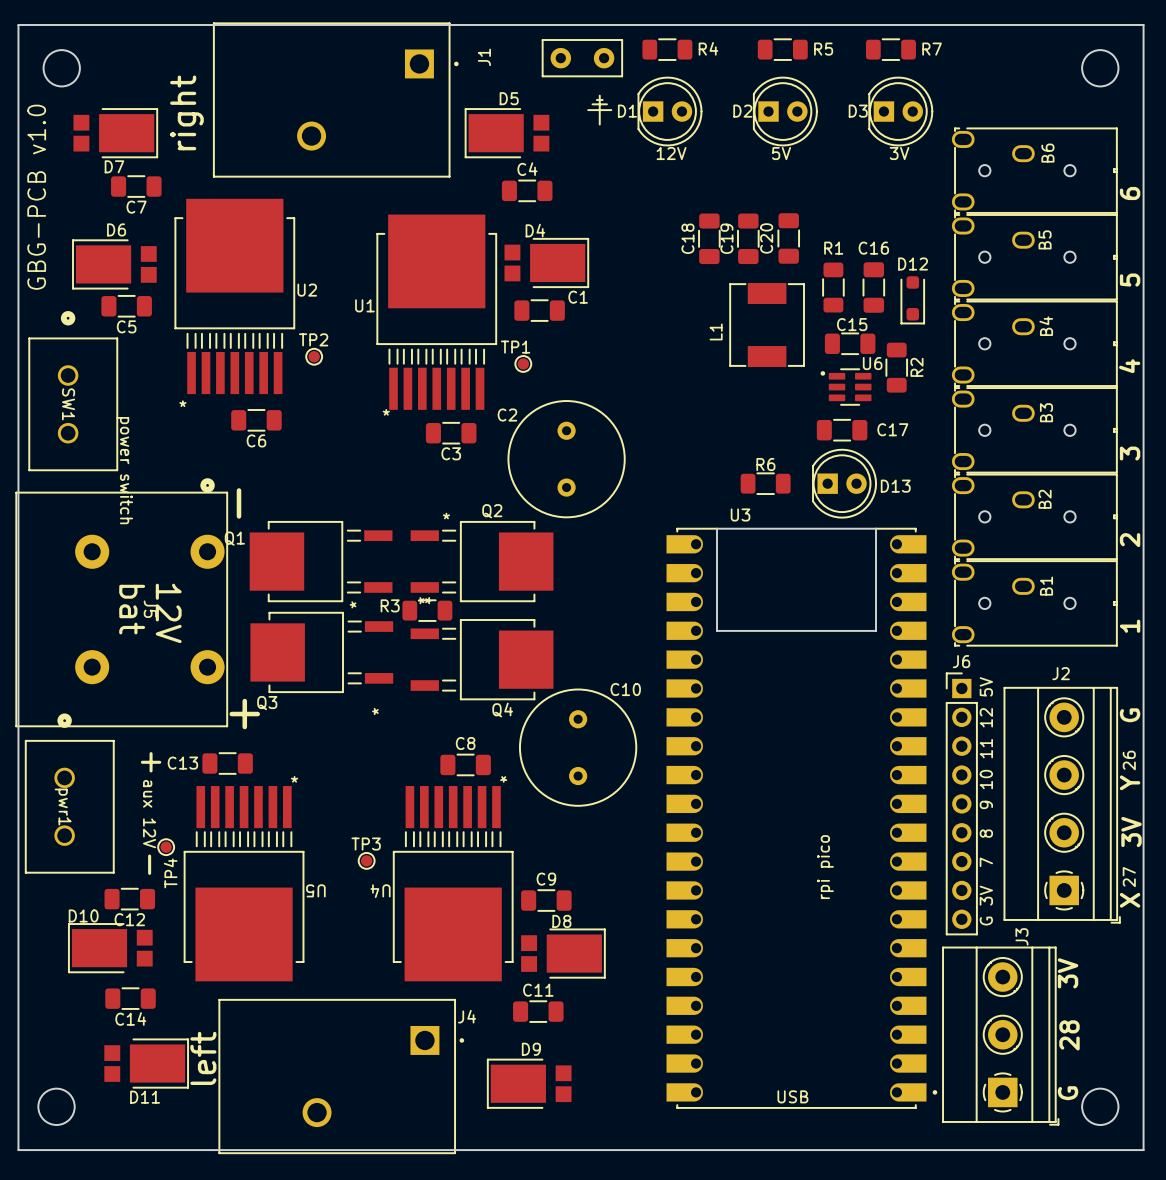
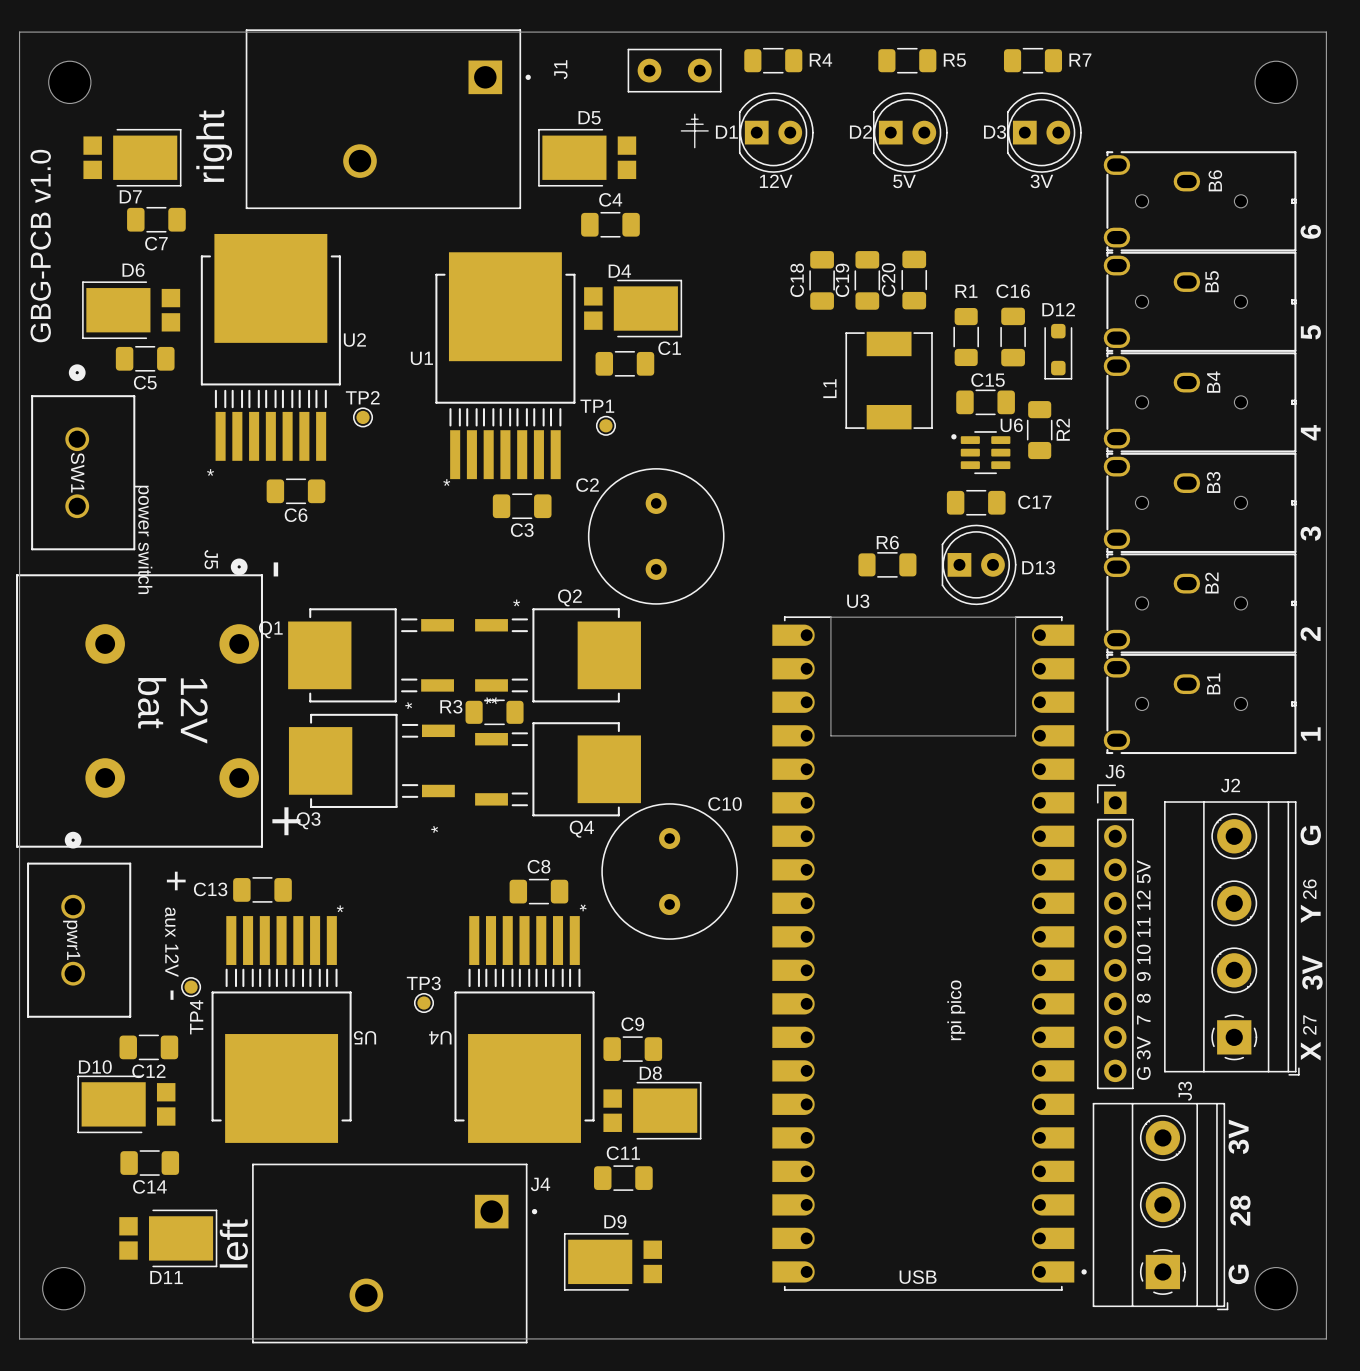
J5 name position: J5 (150, 609) -> J5 (211, 559)

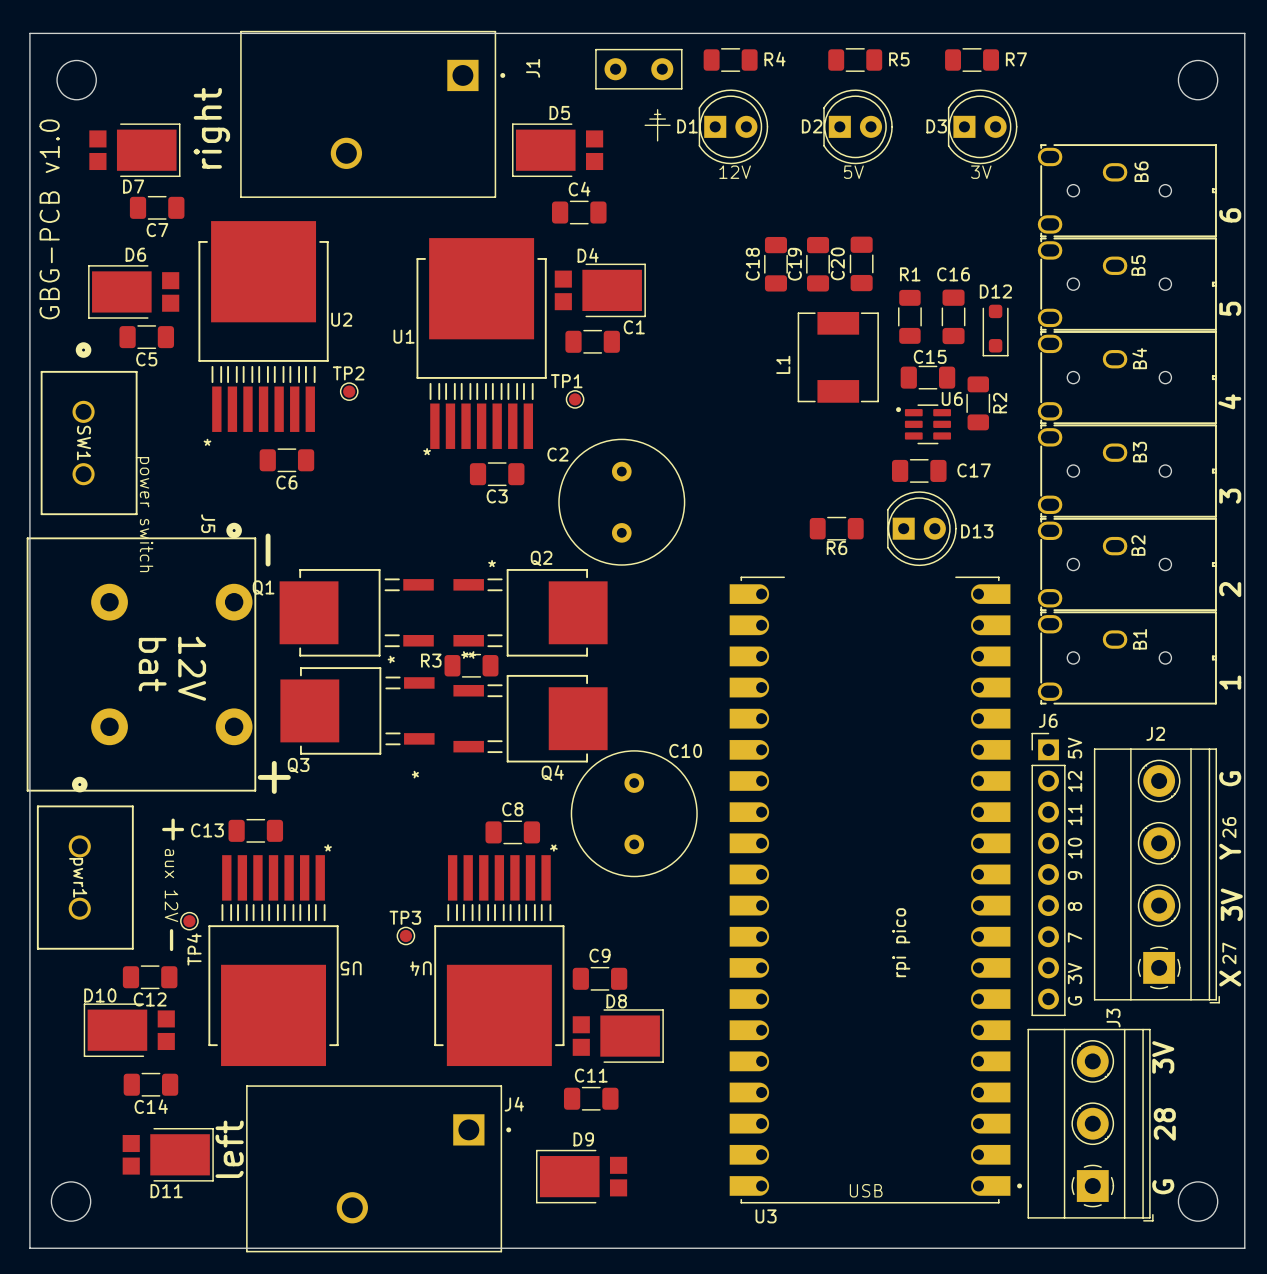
R6 name position: R6 (887, 542) -> R6 (837, 548)
U3 name position: U3 (858, 601) -> U3 (766, 1216)
U3 footprint: [772, 616, 1087, 1291] -> [729, 576, 1023, 1204]

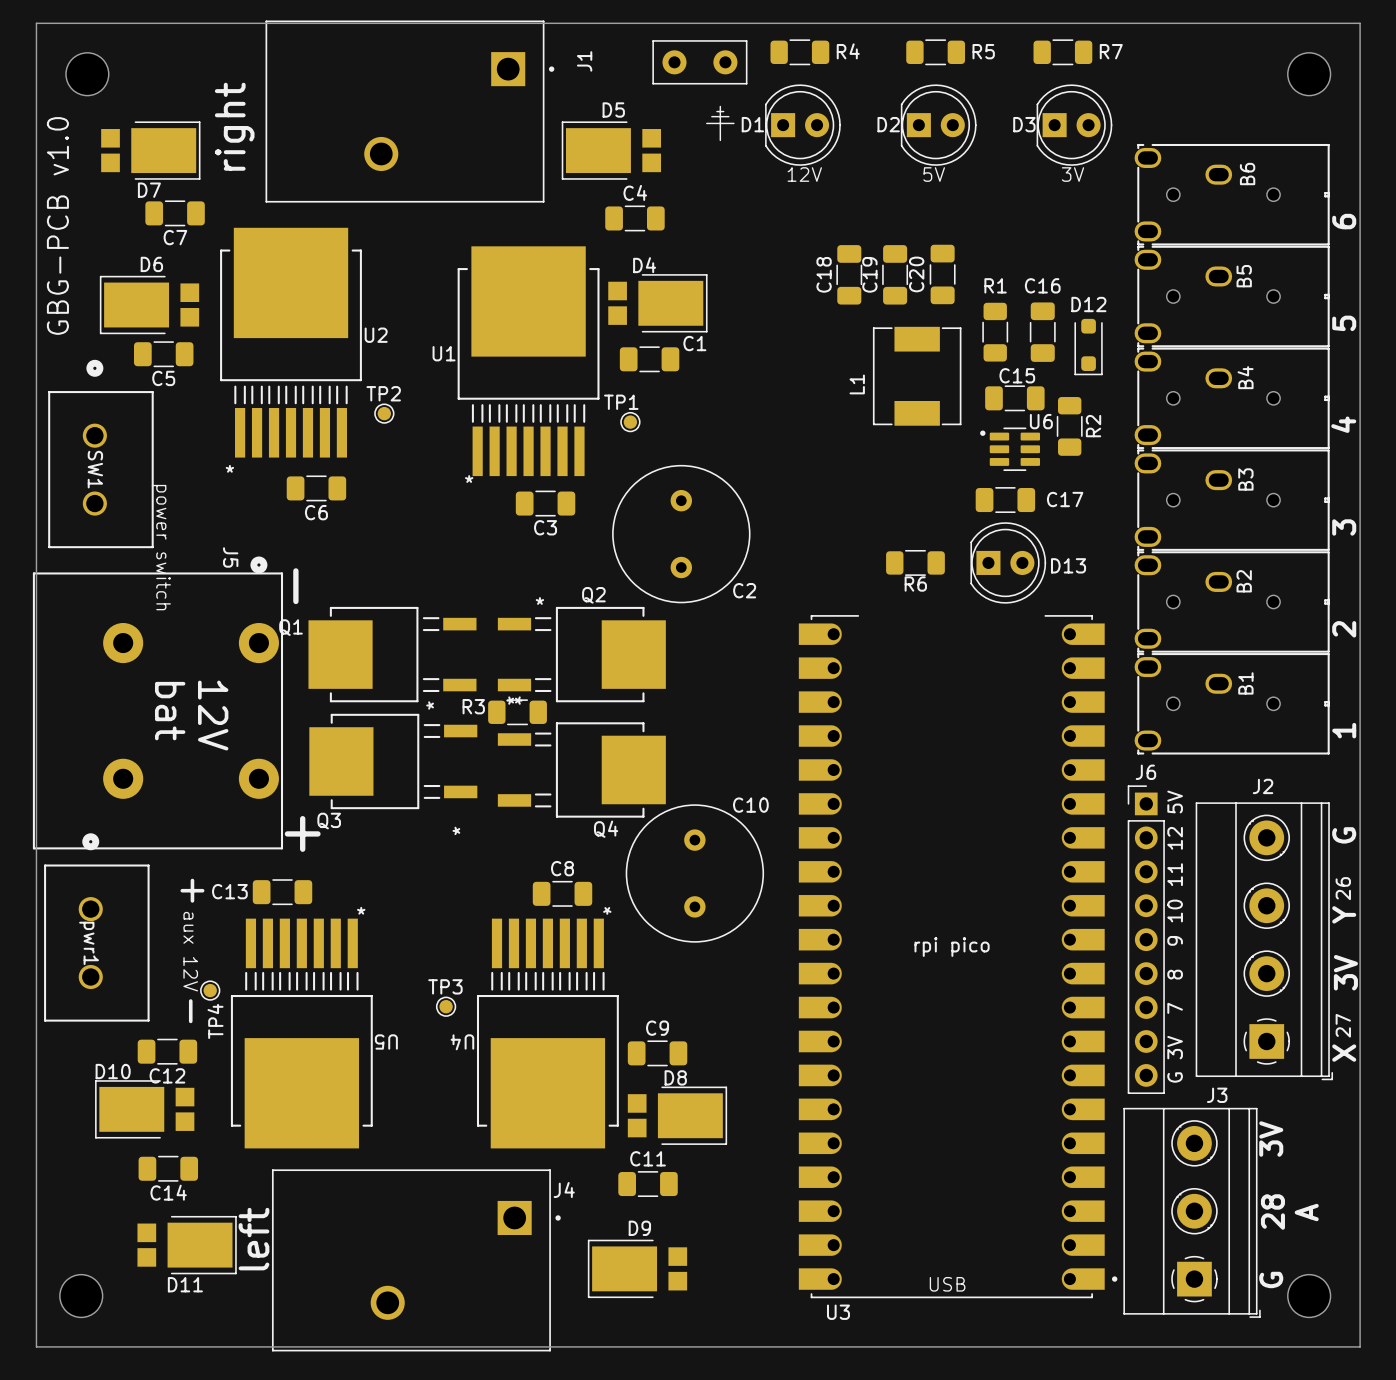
C2 name position: C2 (557, 454) -> C2 (744, 590)
U3 value rotation: 0° (901, 942) -> 90° clockwise (952, 947)
J3 name rotation: 0° (1113, 1018) -> 90° clockwise (1217, 1095)
text: none -> A (1306, 1212)

